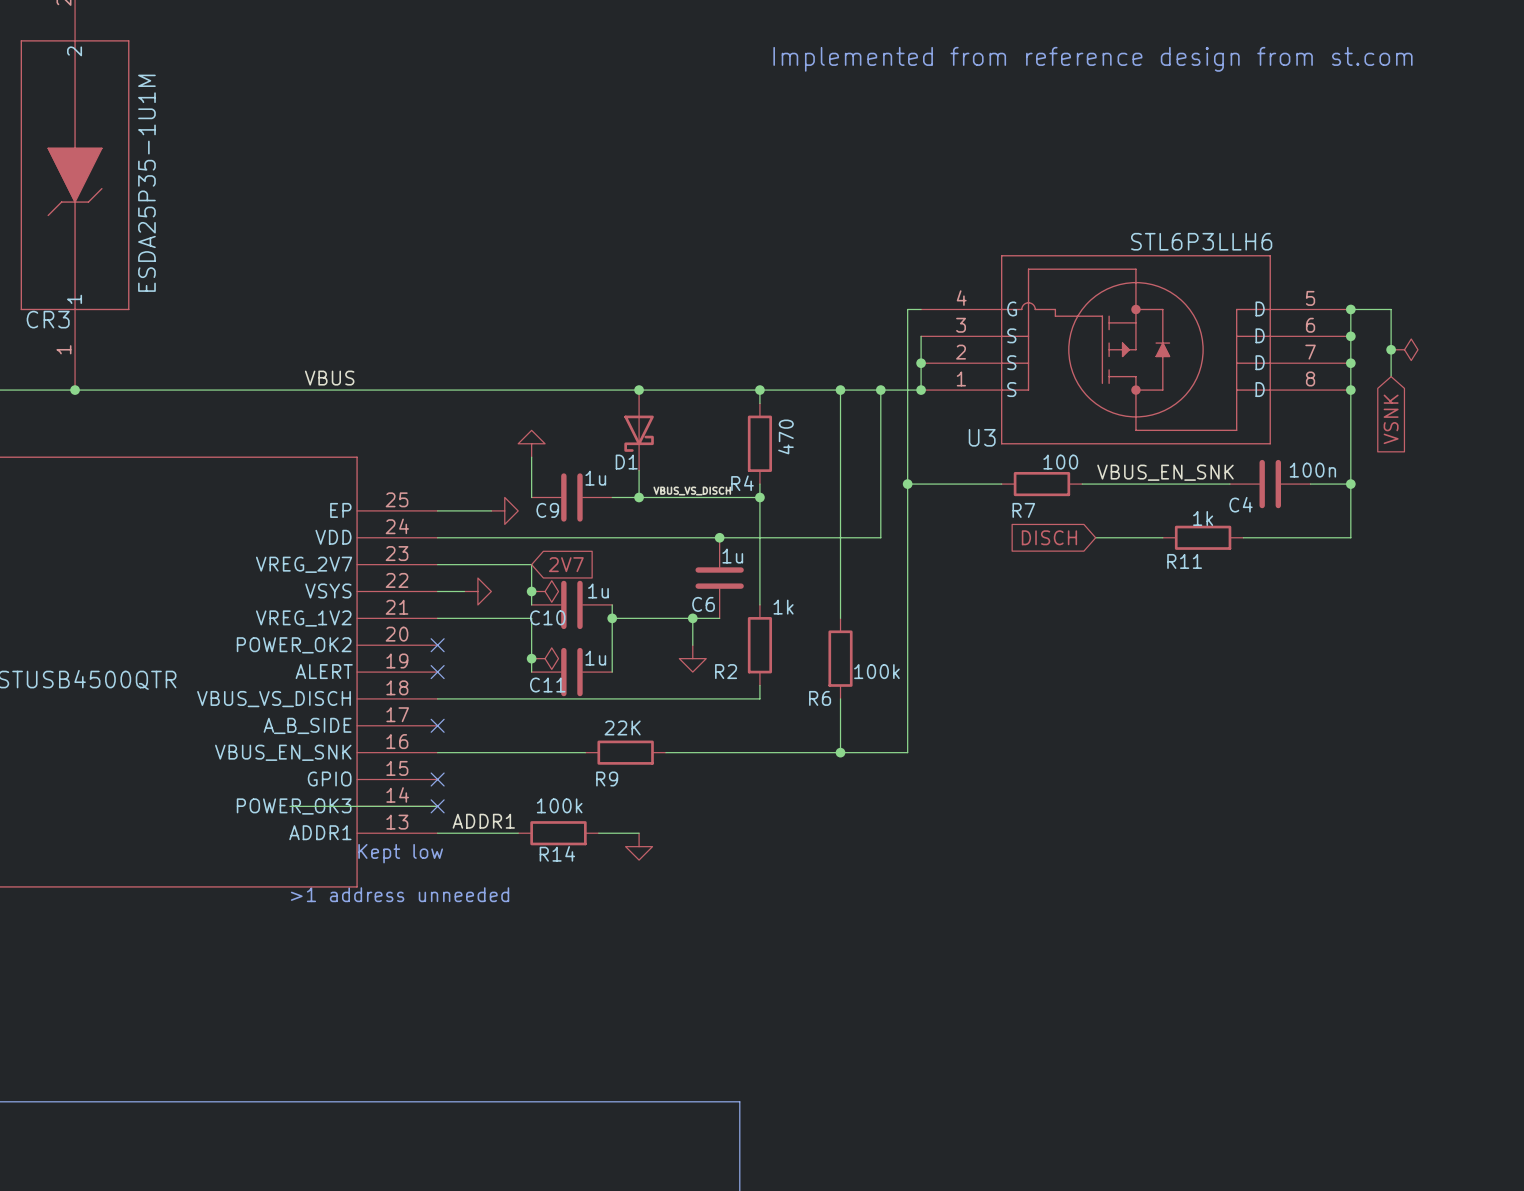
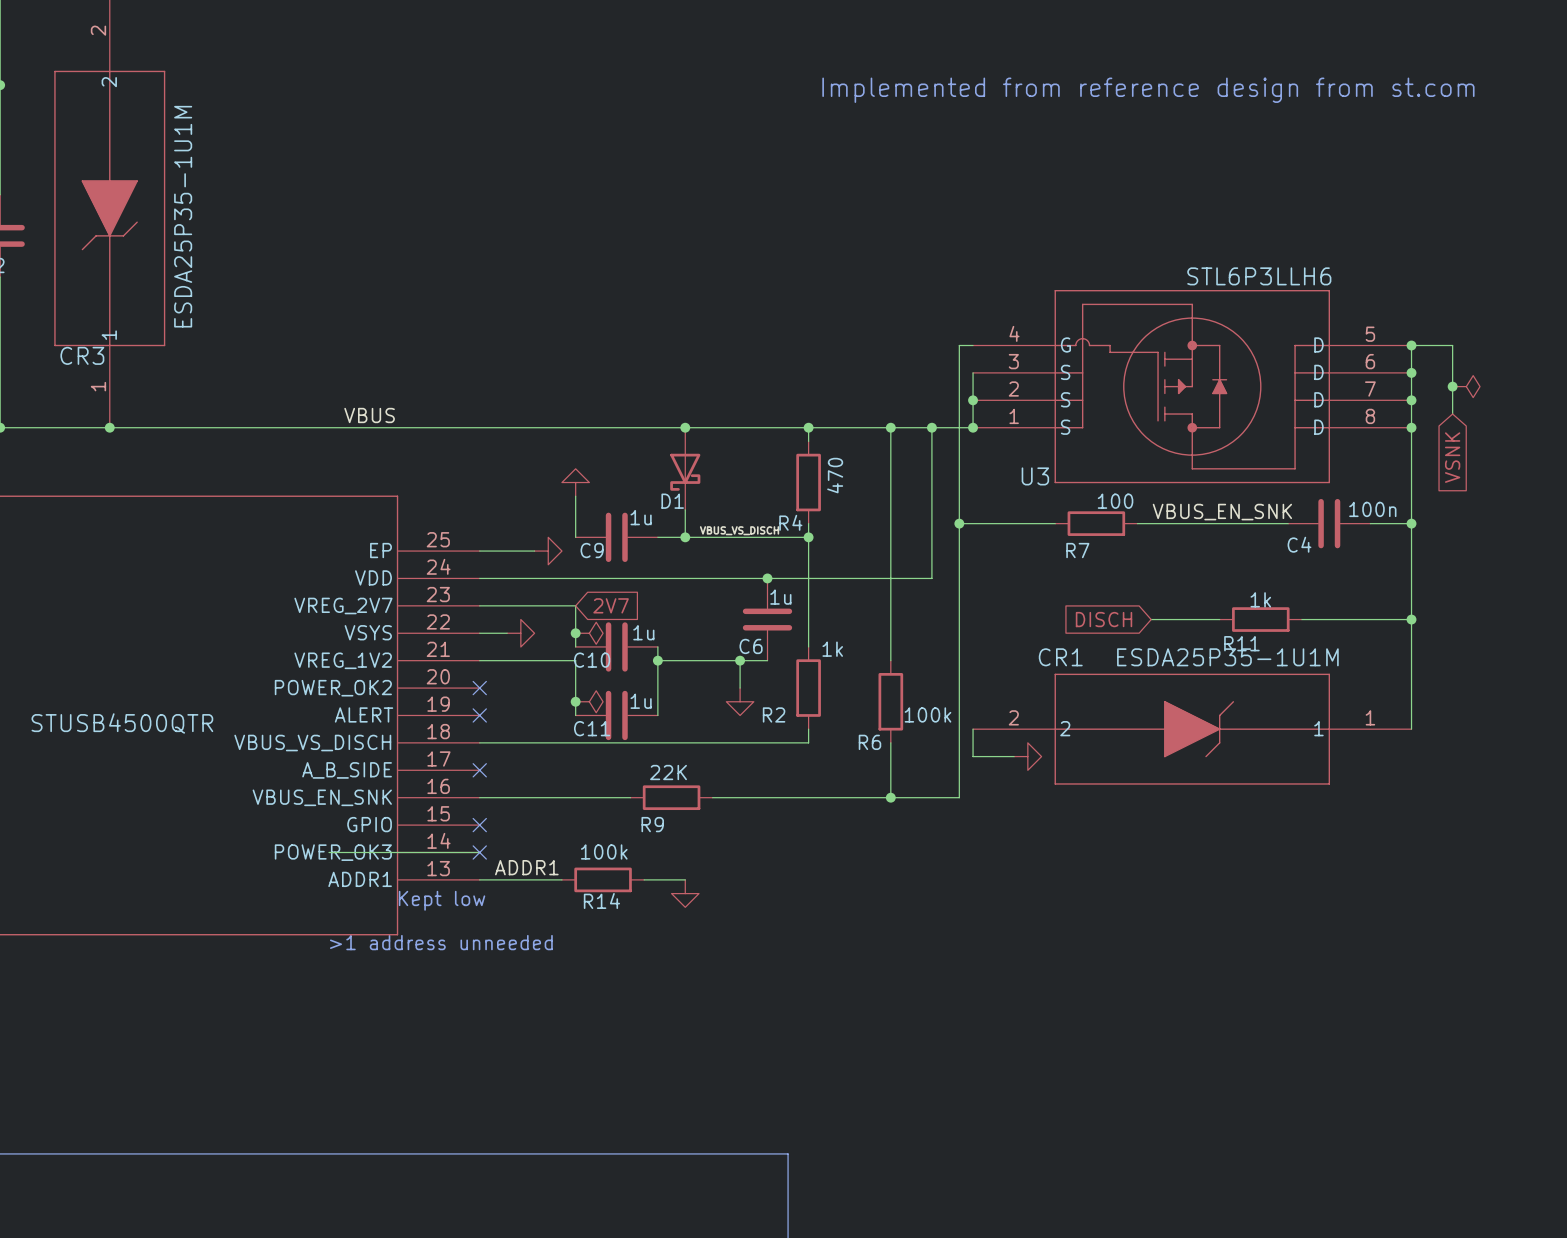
global label position: DISCH (1049, 537) -> DISCH (1104, 619)
wire: (1095, 537) (1162, 537) -> (1151, 619) (1219, 619)
R11 position: (1203, 537) -> (1260, 619)
wire: (1243, 537) (1350, 537) -> (1411, 729) (1411, 578)
wire: none -> (1301, 619) (1411, 619)
junction: none -> (1411, 619)
wire: none -> (973, 729) (973, 756) (1014, 756)
CR1: none -> ESDA25P35-1U1M (1192, 729)
power symbol: none -> (1027, 756)

